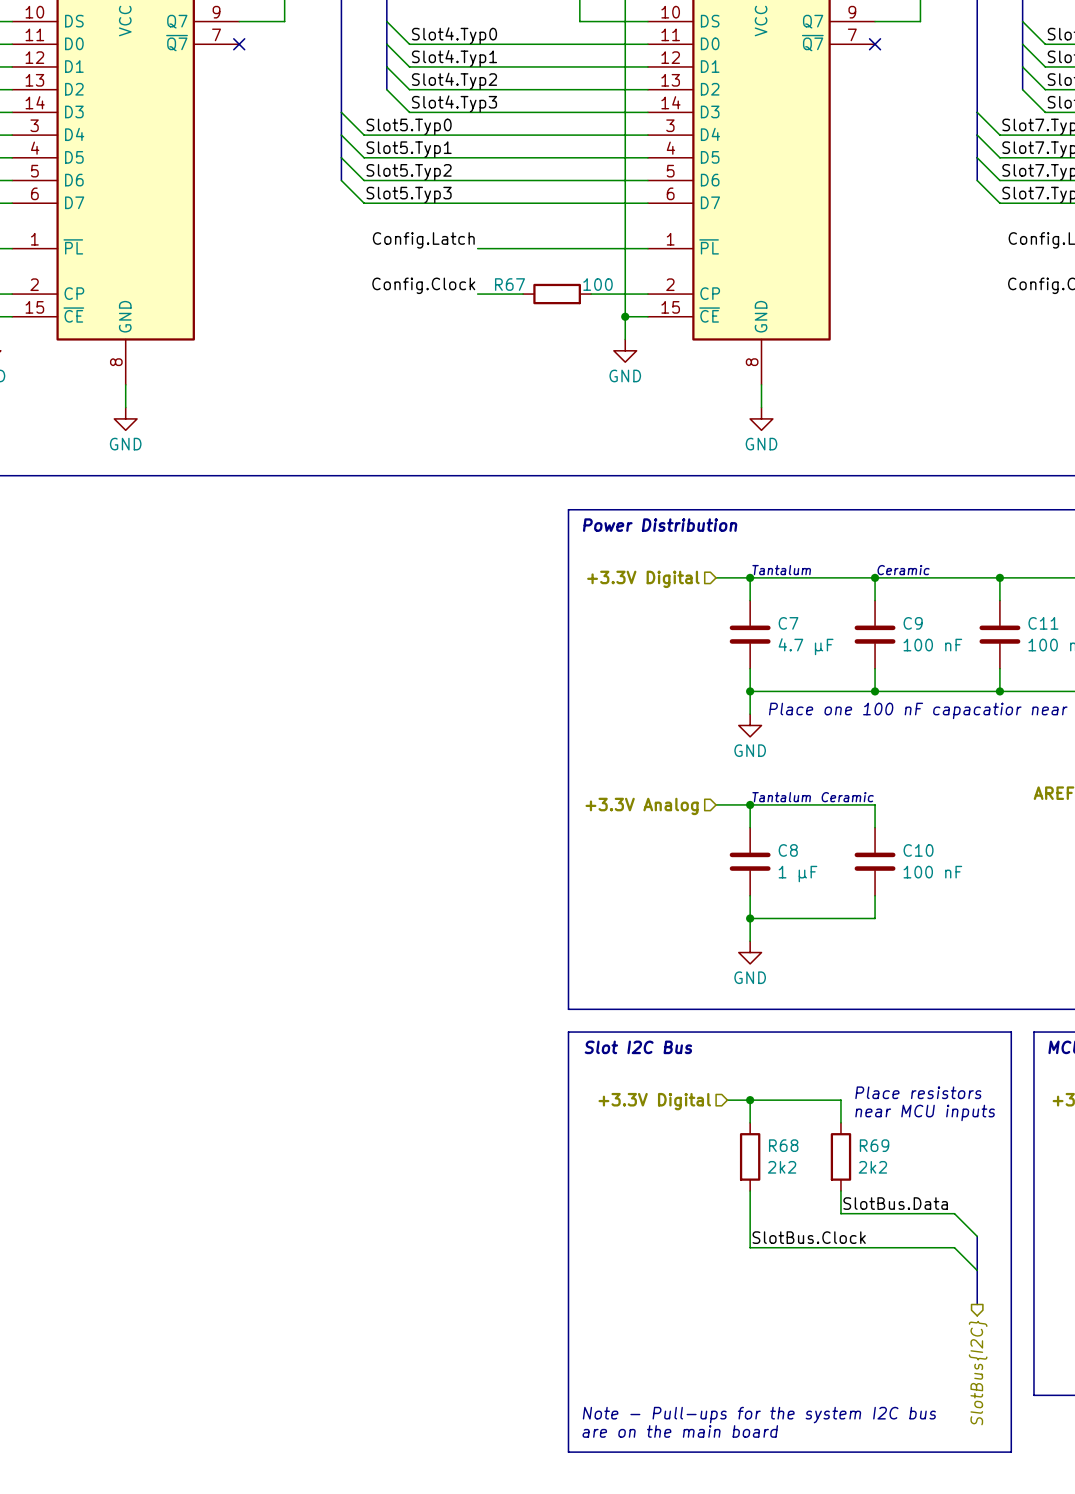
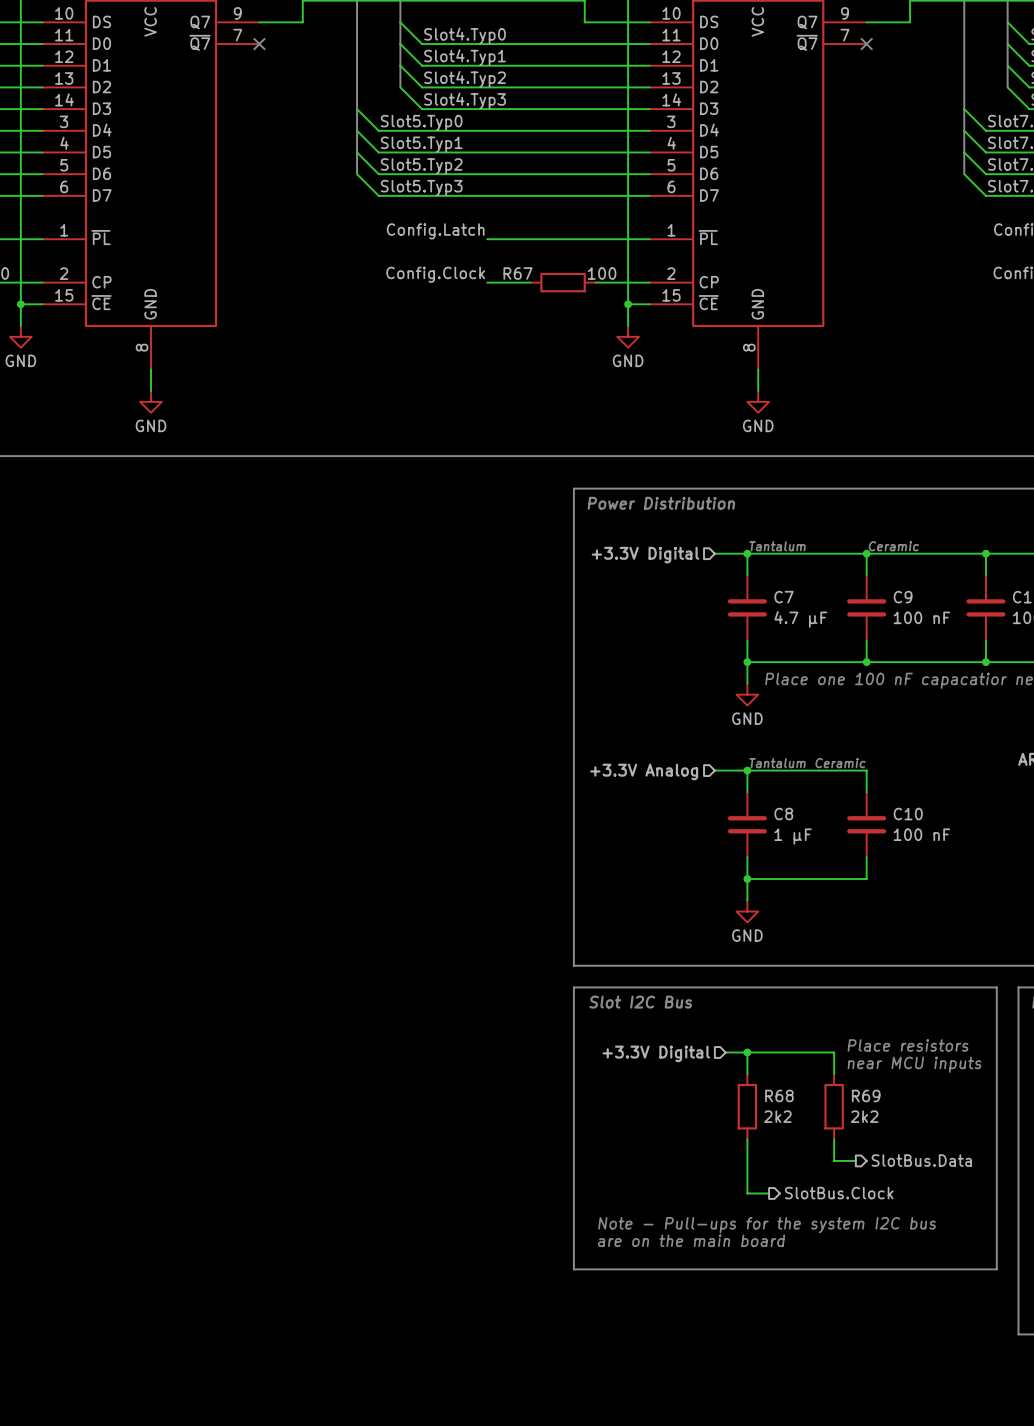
label: SlotBus.Data (895, 1203) -> none
wire: (863, 1213) (954, 1213) (977, 1236) -> none
hierarchical label: none -> SlotBus.Data (921, 1160)
bus: (977, 1236) (977, 1304) -> none
label: SlotBus.Clock (809, 1237) -> none
wire: (772, 1247) (954, 1247) (977, 1270) -> none
hierarchical label: none -> SlotBus.Clock (839, 1193)
line: (568, 1327) (568, 1452) (1011, 1452) (1011, 1327) -> (573, 1269) (996, 1269)
hierarchical label: SlotBus{I2C} (978, 1373) -> none
text position: Note - Pull-ups for the system I2C bus (759, 1415) -> Note - Pull-ups for the system I2C bus (767, 1225)
text position: are on the main board (680, 1431) -> are on the main board (691, 1240)

